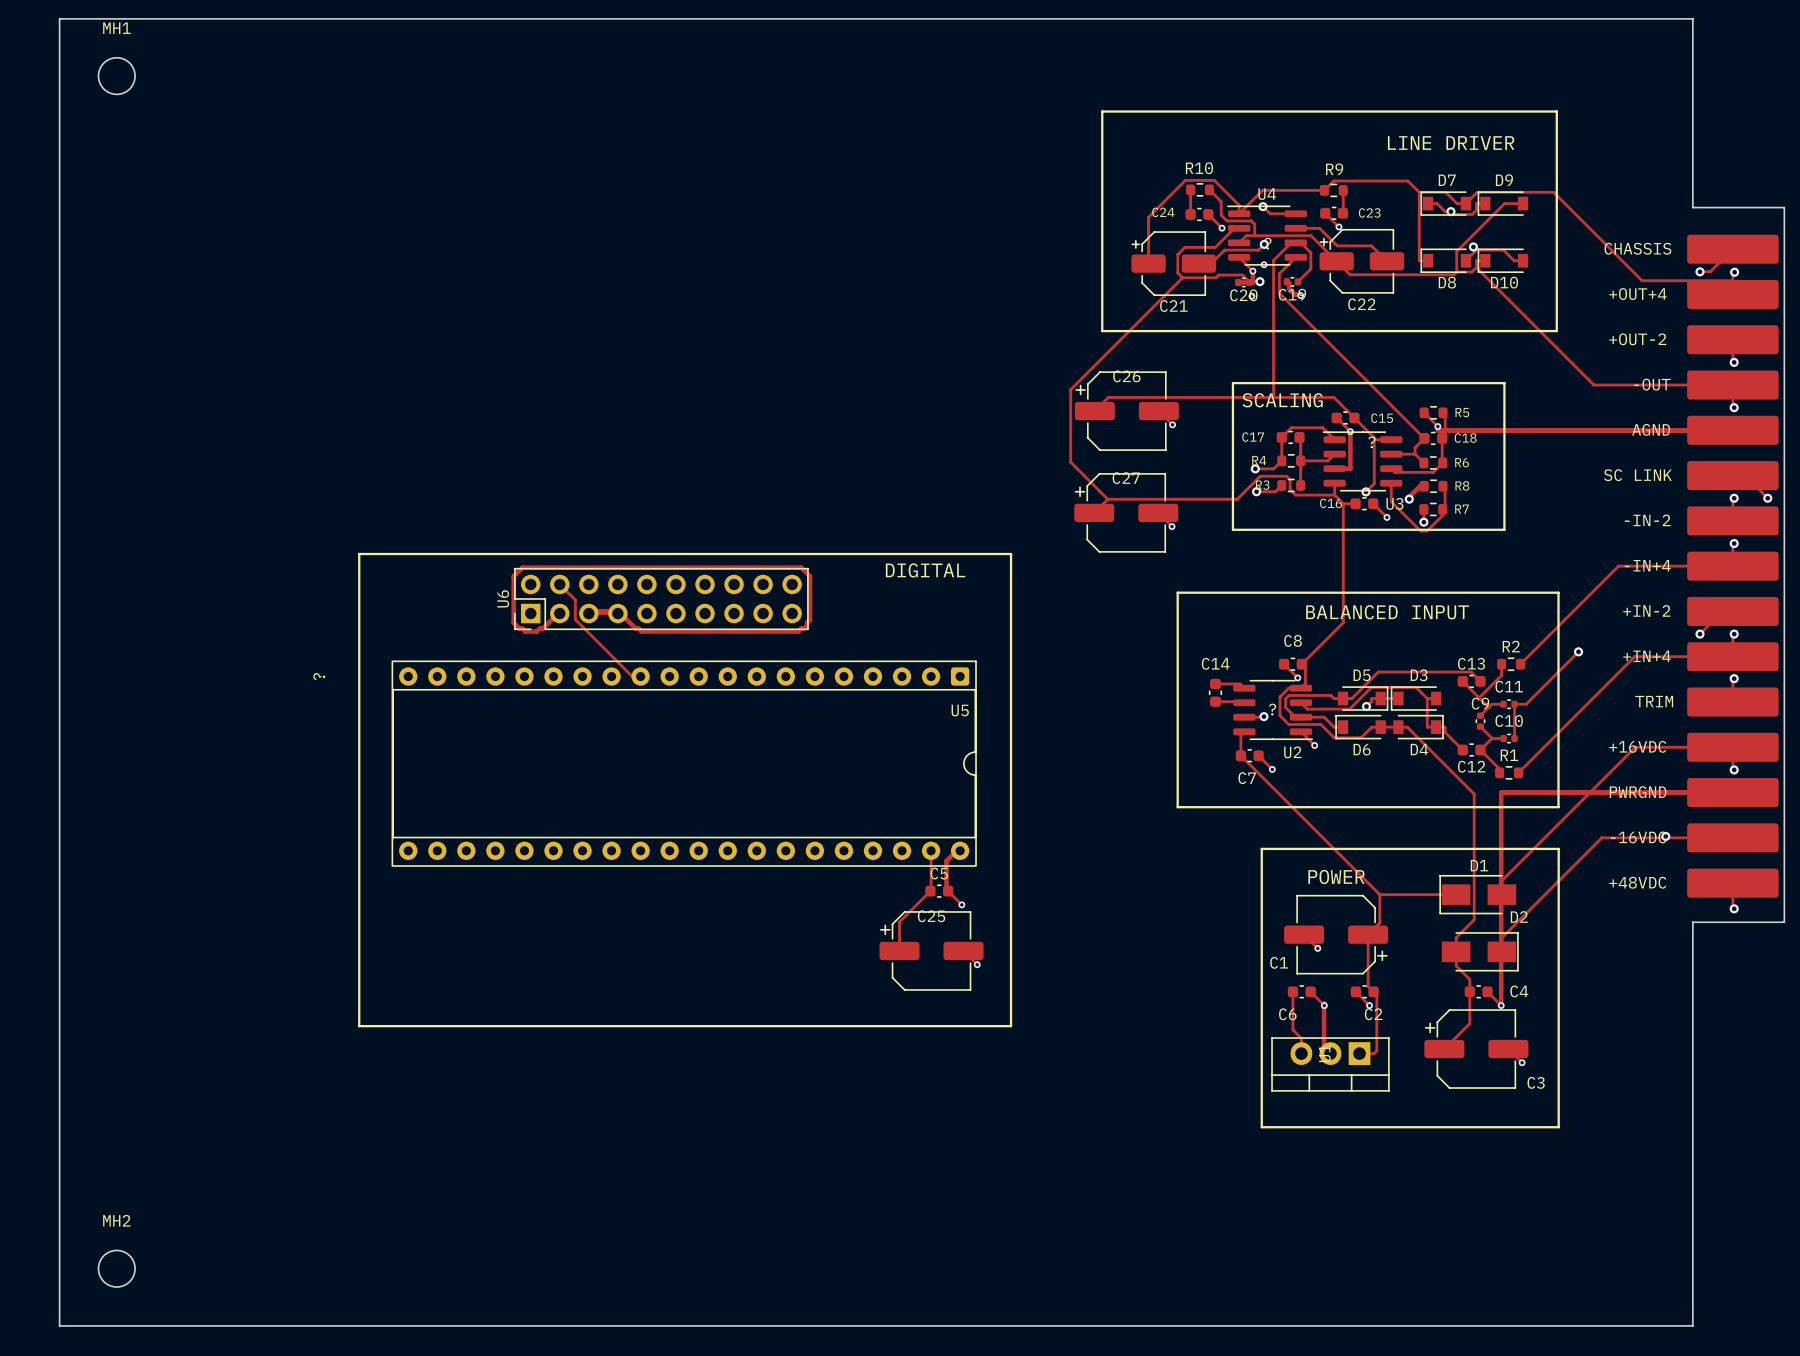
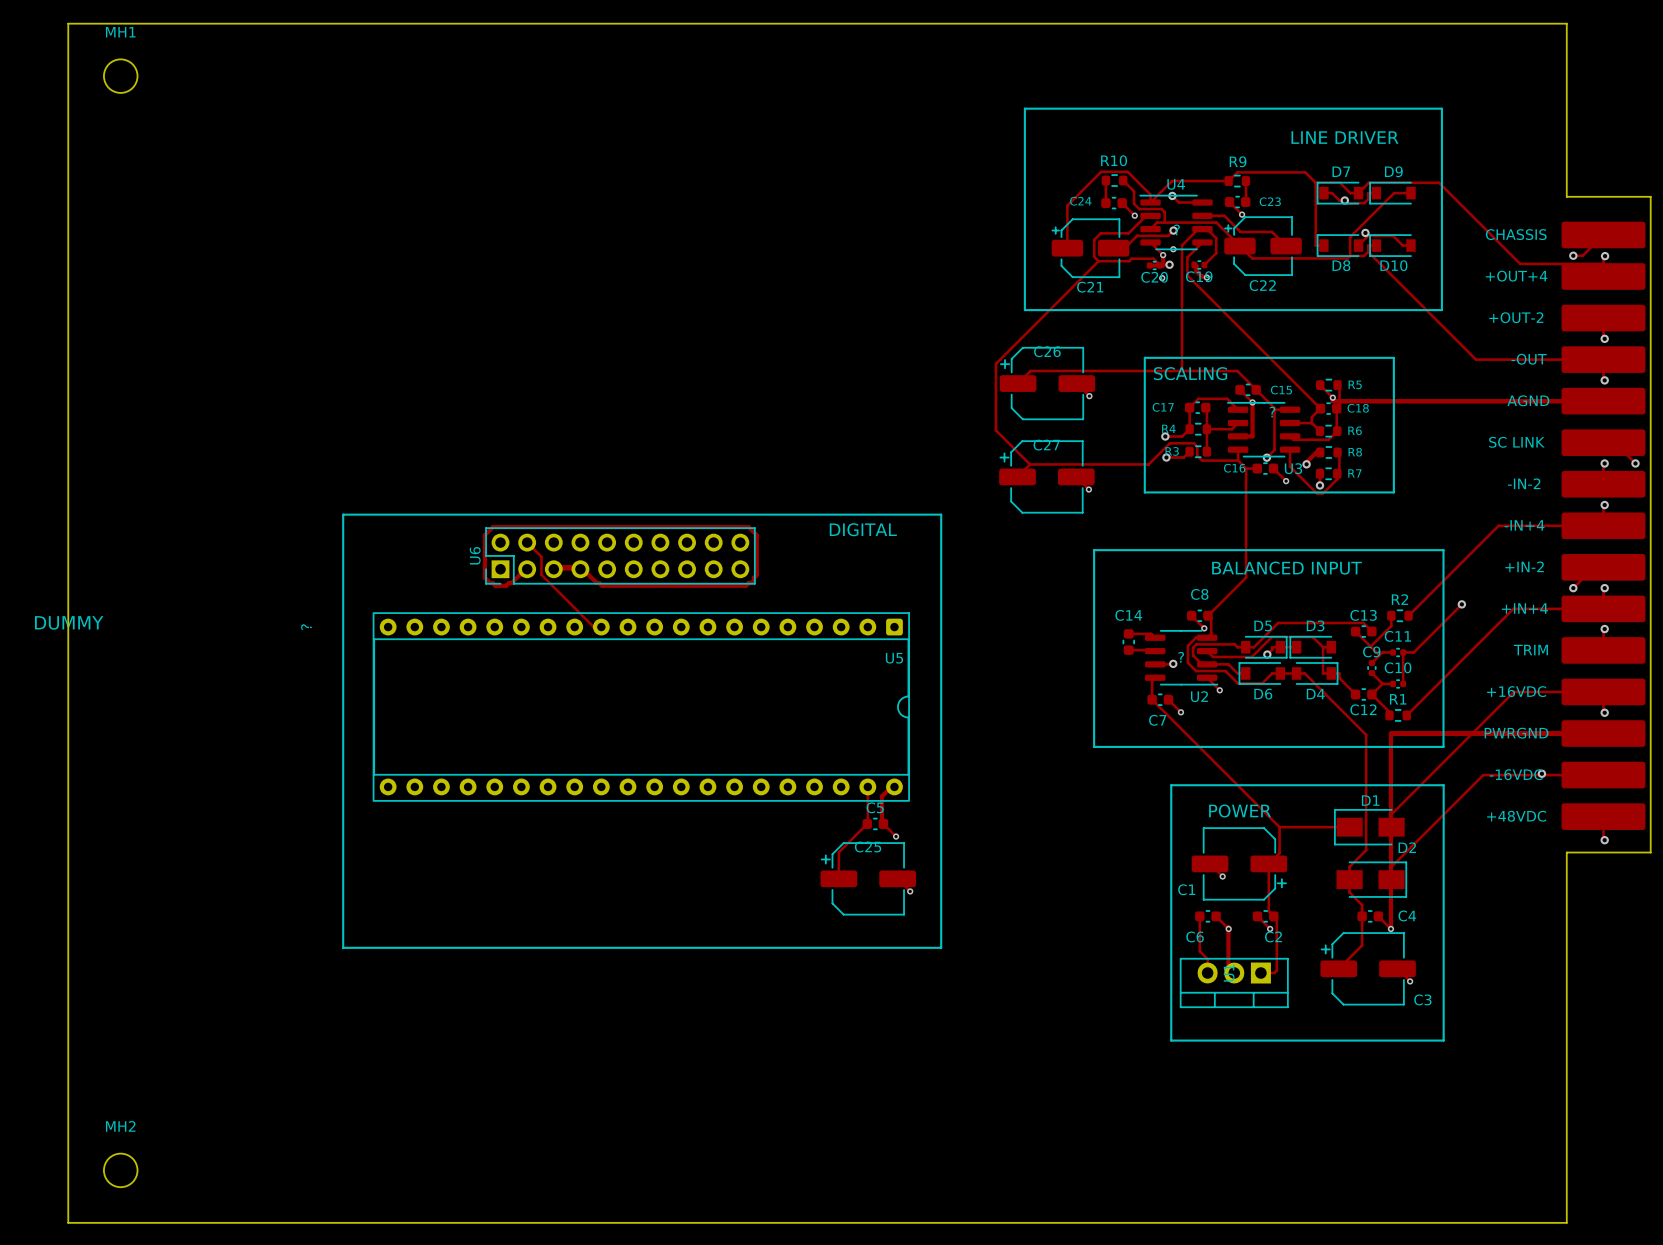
DUMMY: none -> (69, 622)

